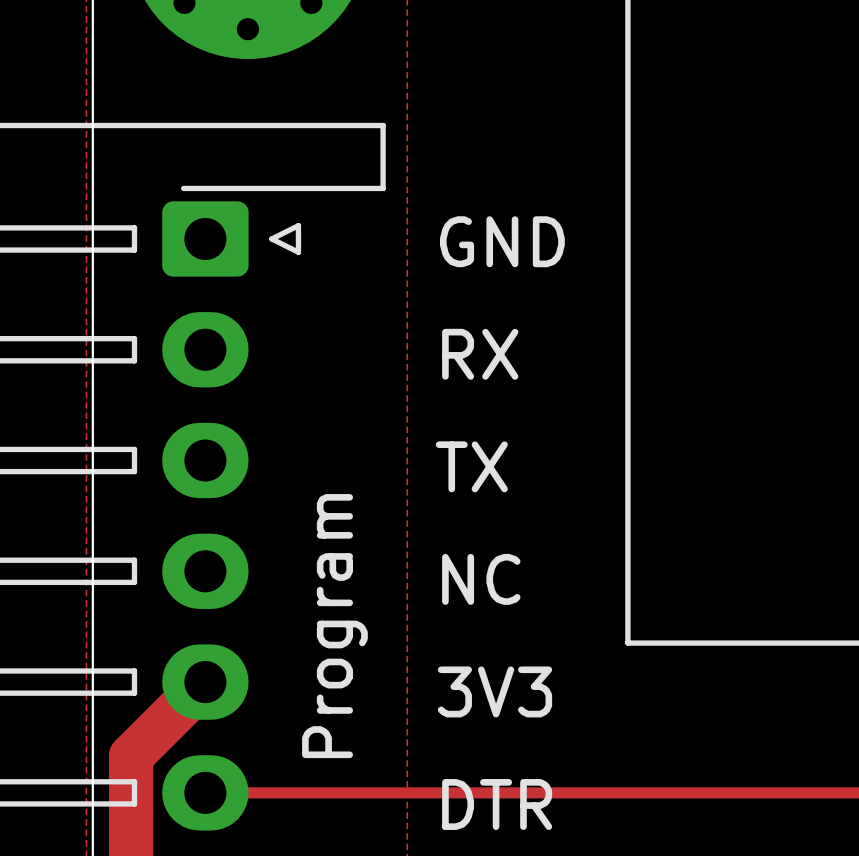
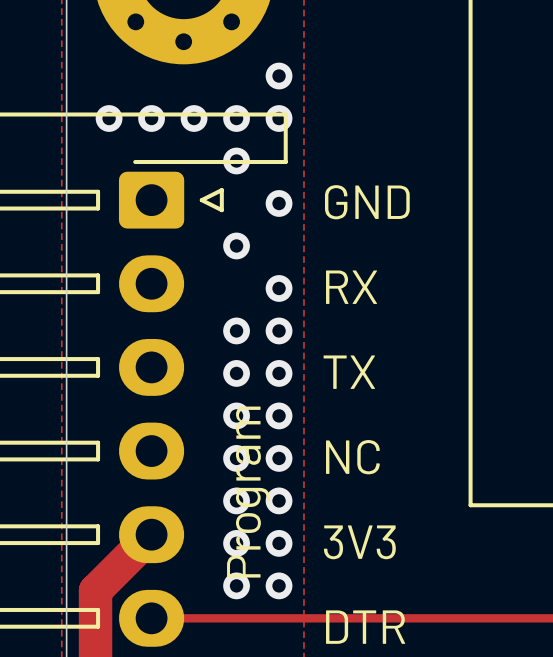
via: none -> (279, 76)
via: none -> (109, 118)
via: none -> (151, 118)
via: none -> (194, 118)
via: none -> (236, 118)
via: none -> (279, 118)
via: none -> (236, 160)
via: none -> (279, 203)
via: none -> (236, 245)
via: none -> (279, 288)
via: none -> (236, 330)
via: none -> (279, 330)
via: none -> (236, 373)
via: none -> (279, 373)
via: none -> (236, 415)
via: none -> (279, 415)
via: none -> (236, 458)
via: none -> (279, 458)
via: none -> (236, 500)
via: none -> (279, 500)
via: none -> (236, 543)
via: none -> (279, 543)
via: none -> (236, 585)
via: none -> (279, 585)

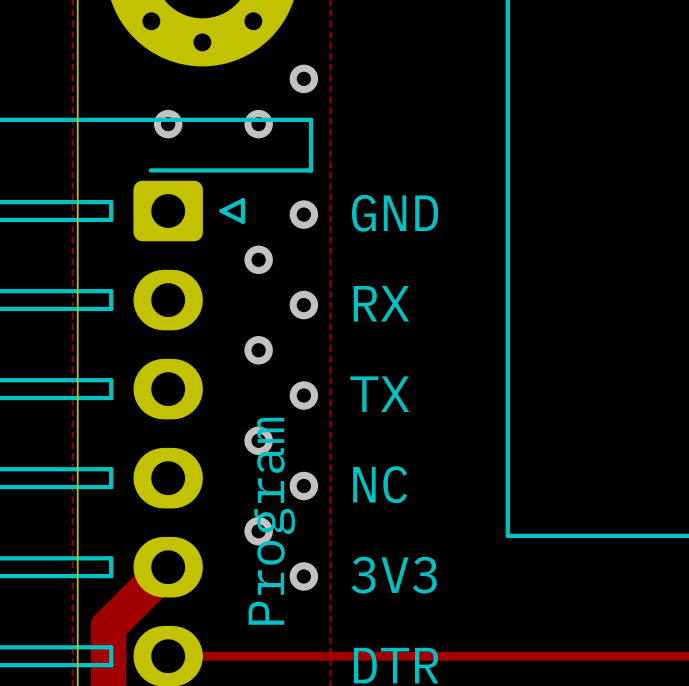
via: (109, 118) -> none
via: (194, 118) -> none
via: (279, 118) -> none
via: (236, 160) -> none
via: (279, 330) -> none
via: (236, 373) -> none
via: (279, 415) -> none
via: (236, 458) -> none
via: (279, 500) -> none
via: (236, 543) -> none
via: (236, 585) -> none
via: (279, 585) -> none

